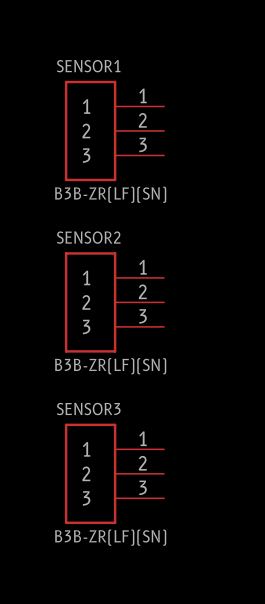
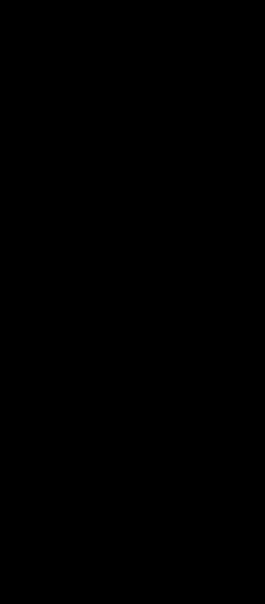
SENSOR1: B3B-ZR(LF)(SN) (114, 130) -> none
SENSOR2: B3B-ZR(LF)(SN) (114, 302) -> none
SENSOR3: B3B-ZR(LF)(SN) (114, 473) -> none

